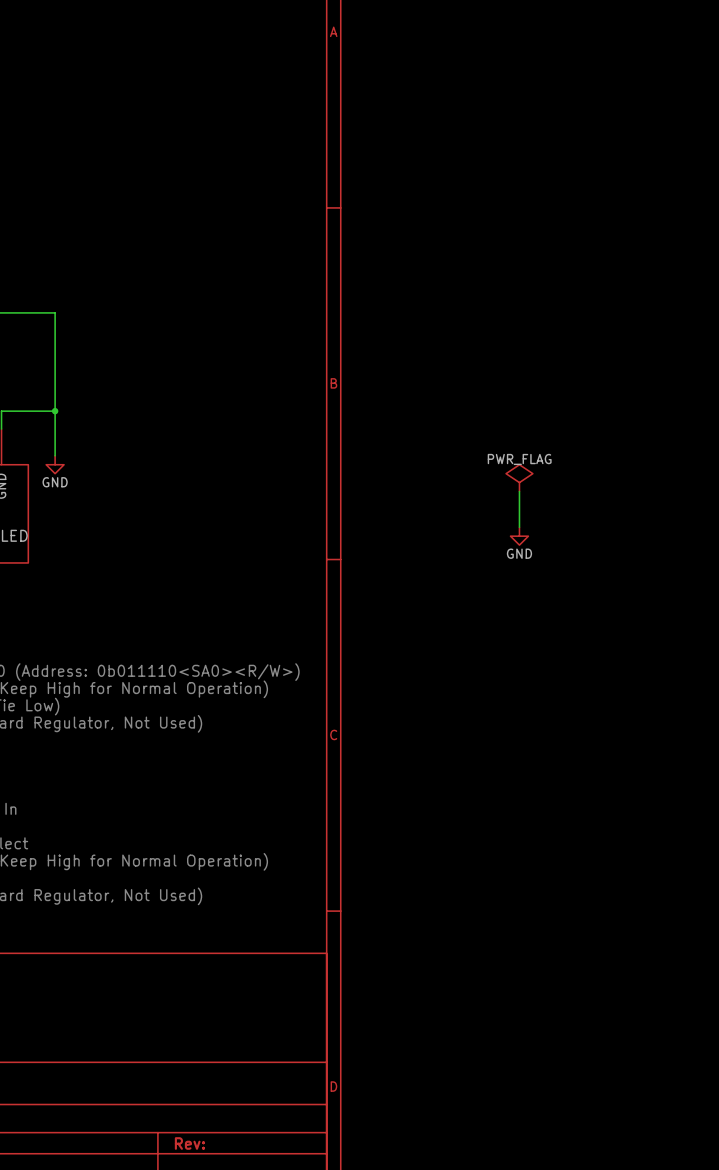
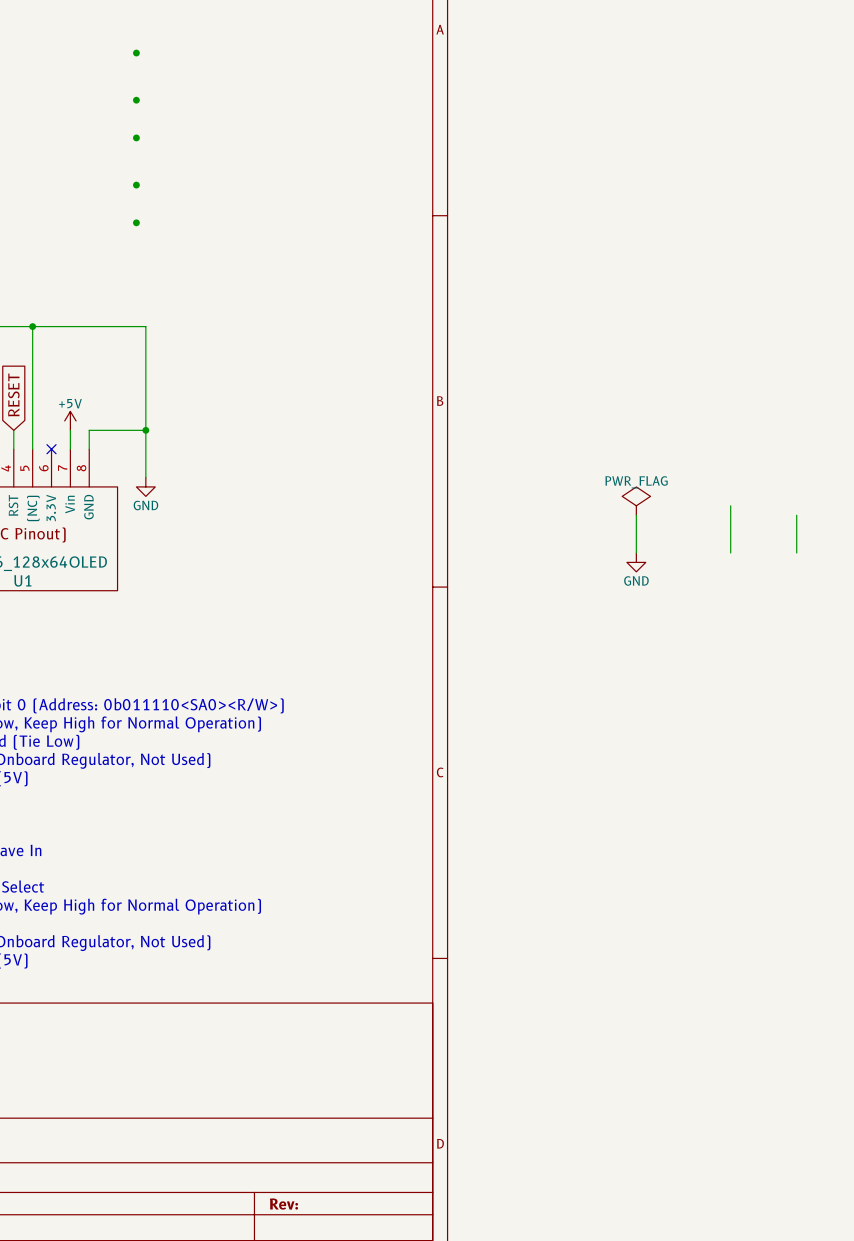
junction: none -> (136, 53)
junction: none -> (136, 100)
junction: none -> (136, 137)
junction: none -> (136, 185)
junction: none -> (136, 222)
wire: none -> (730, 505) (730, 552)
wire: none -> (796, 515) (796, 552)

